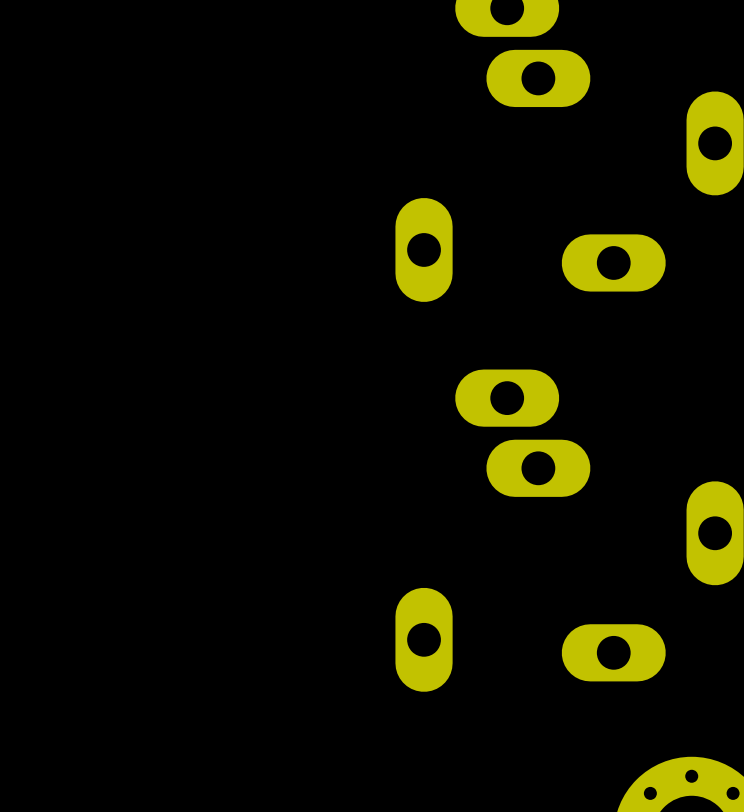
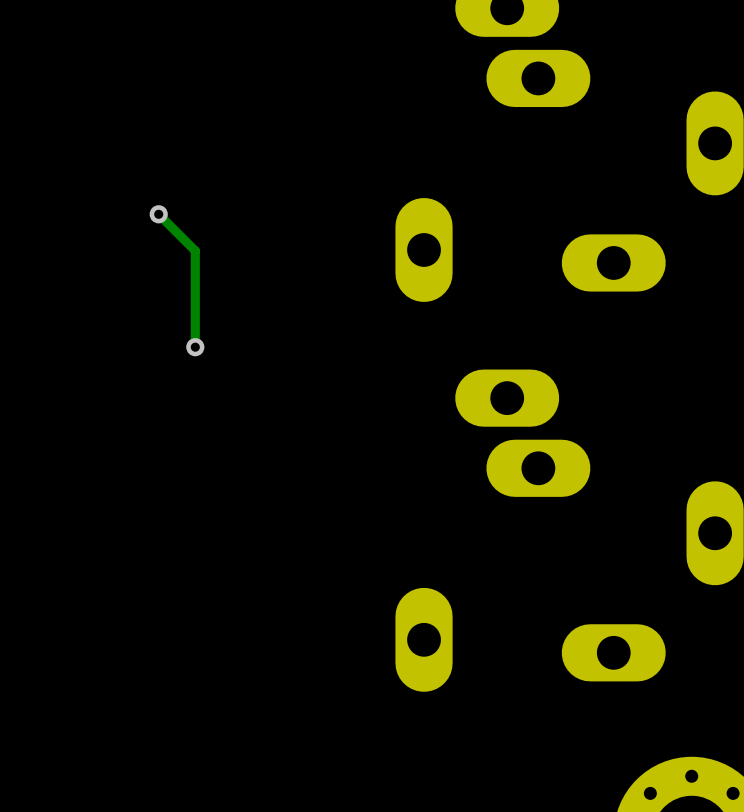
track: none -> (158, 214) (195, 250) (195, 347)
via: none -> (158, 214)
via: none -> (195, 347)

